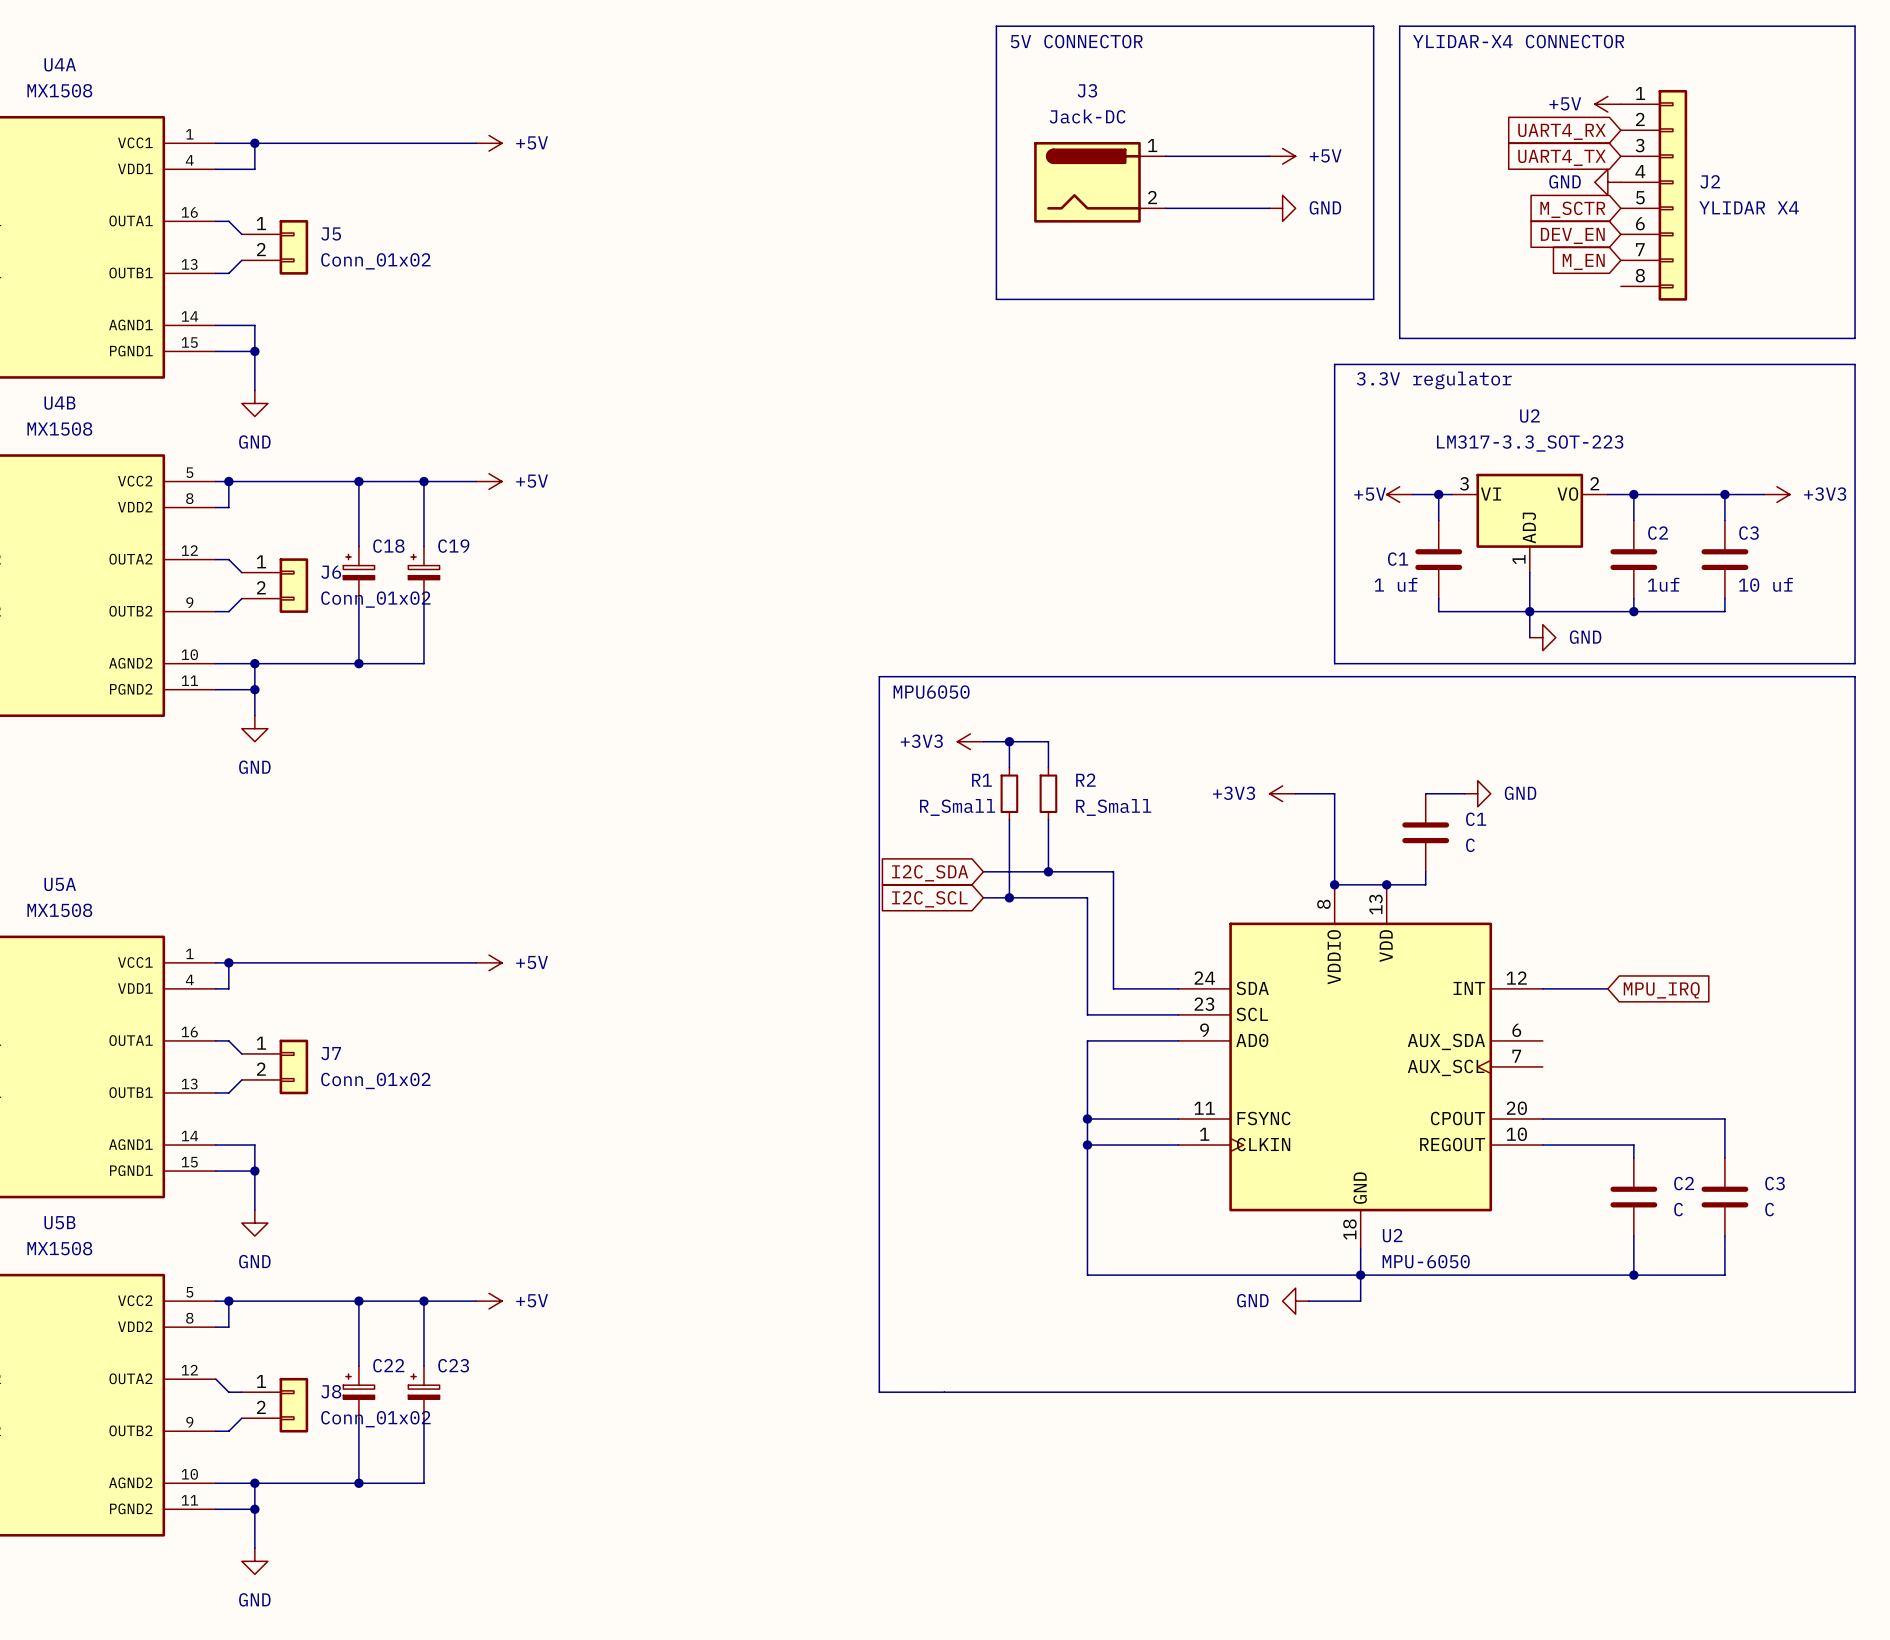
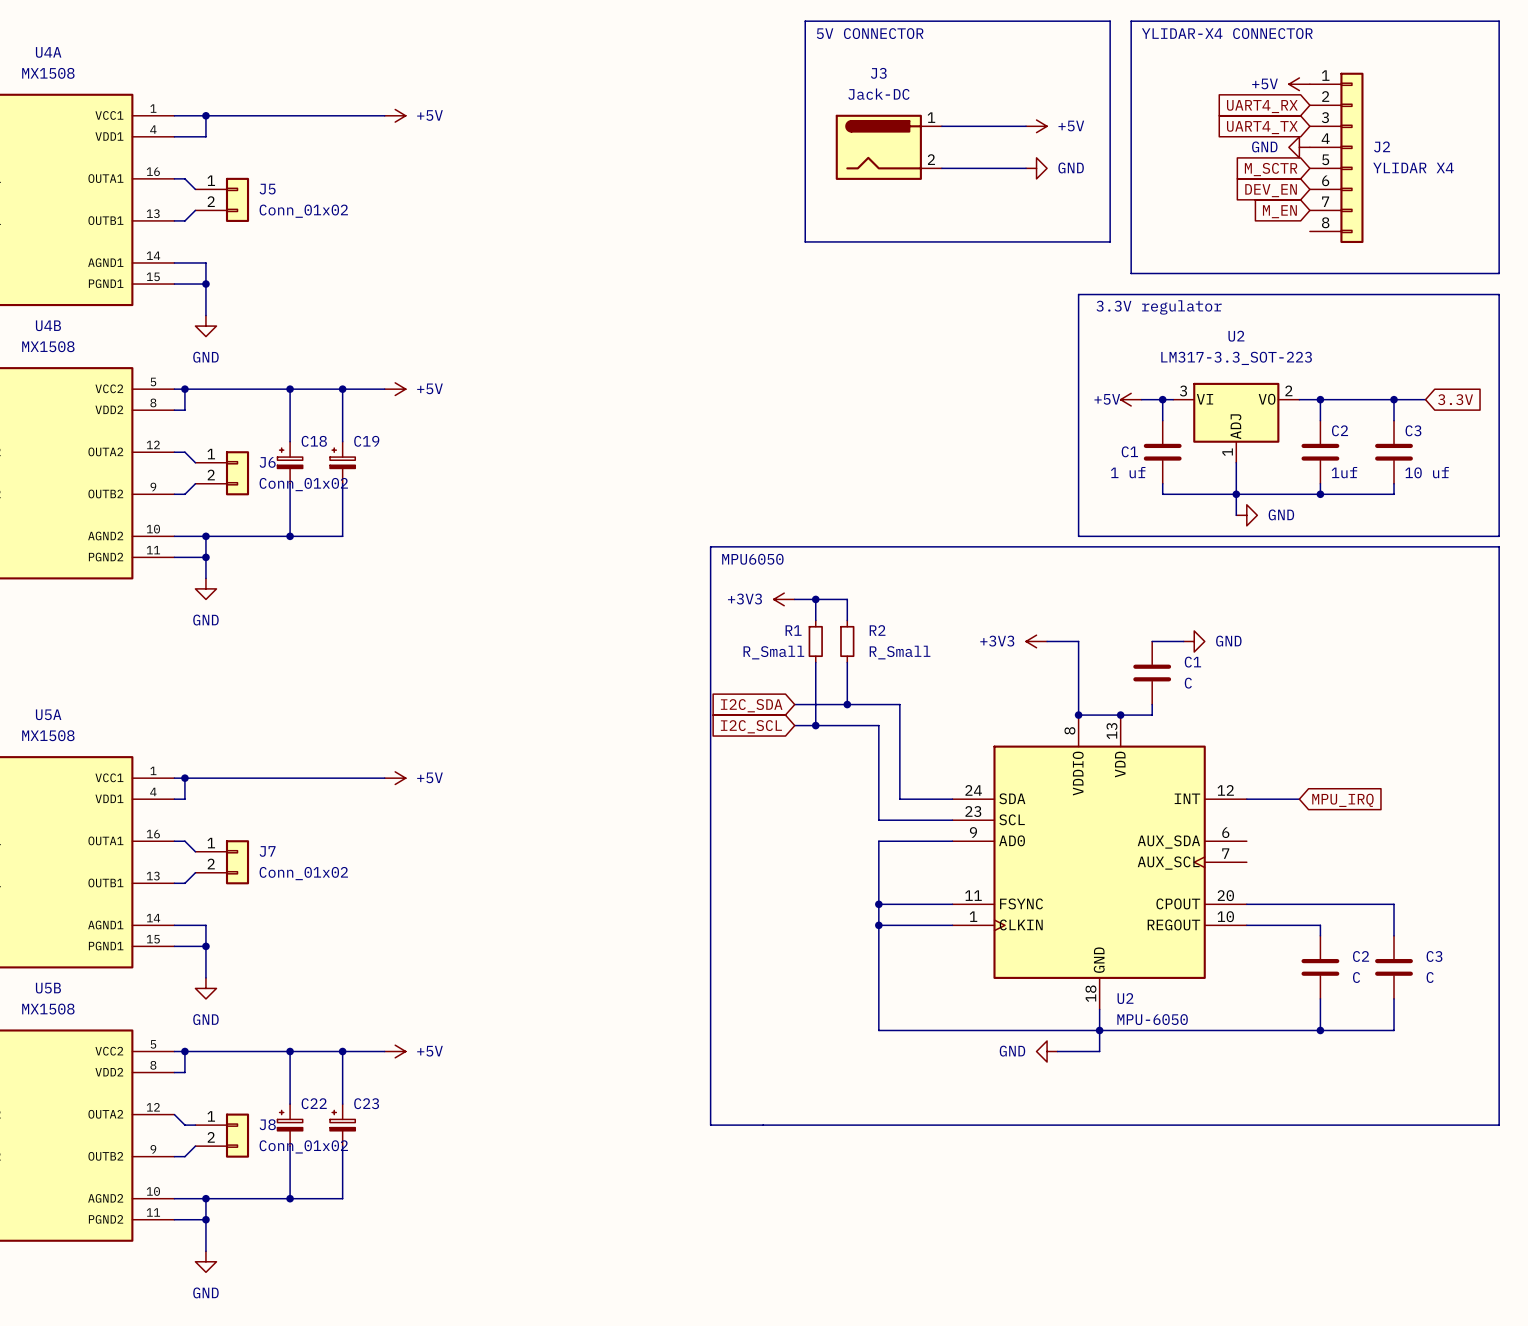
power symbol: +3V3 (1776, 494) -> none
global label: none -> 3.3V (1455, 399)

